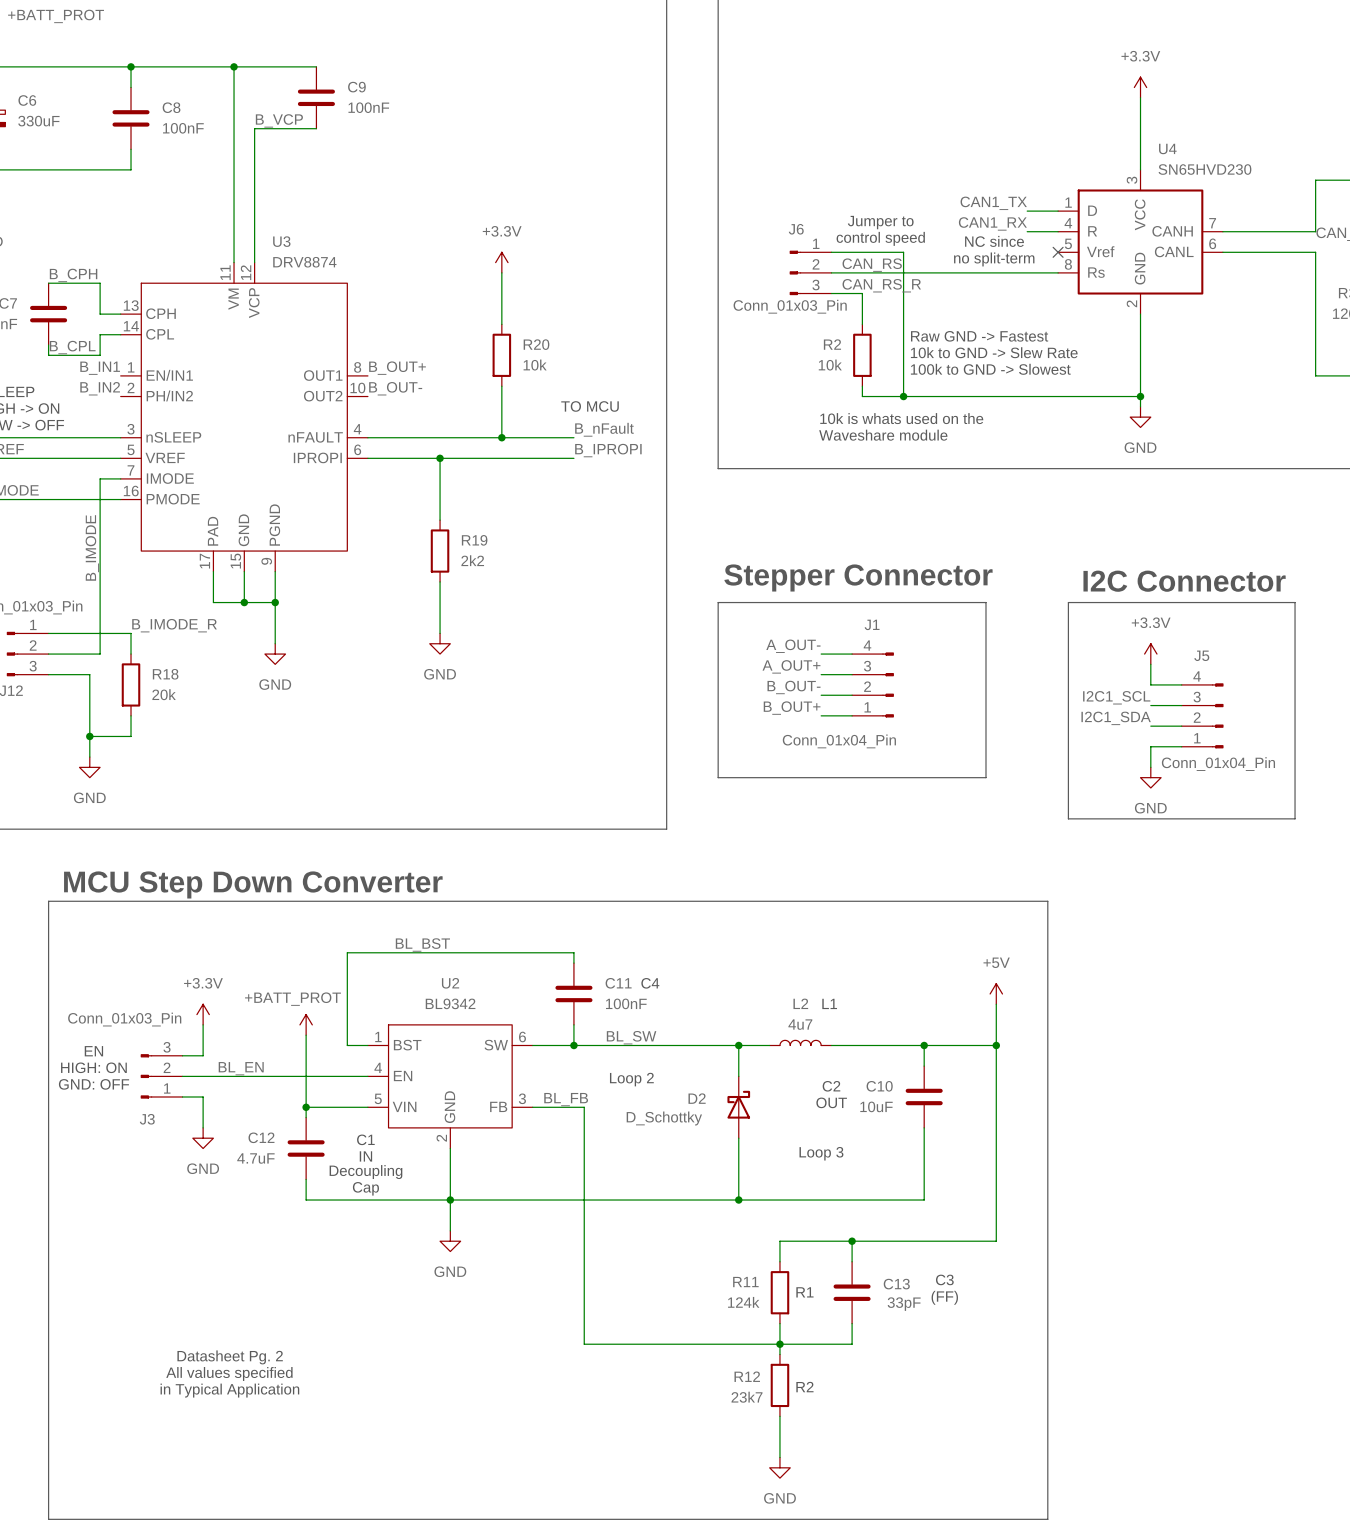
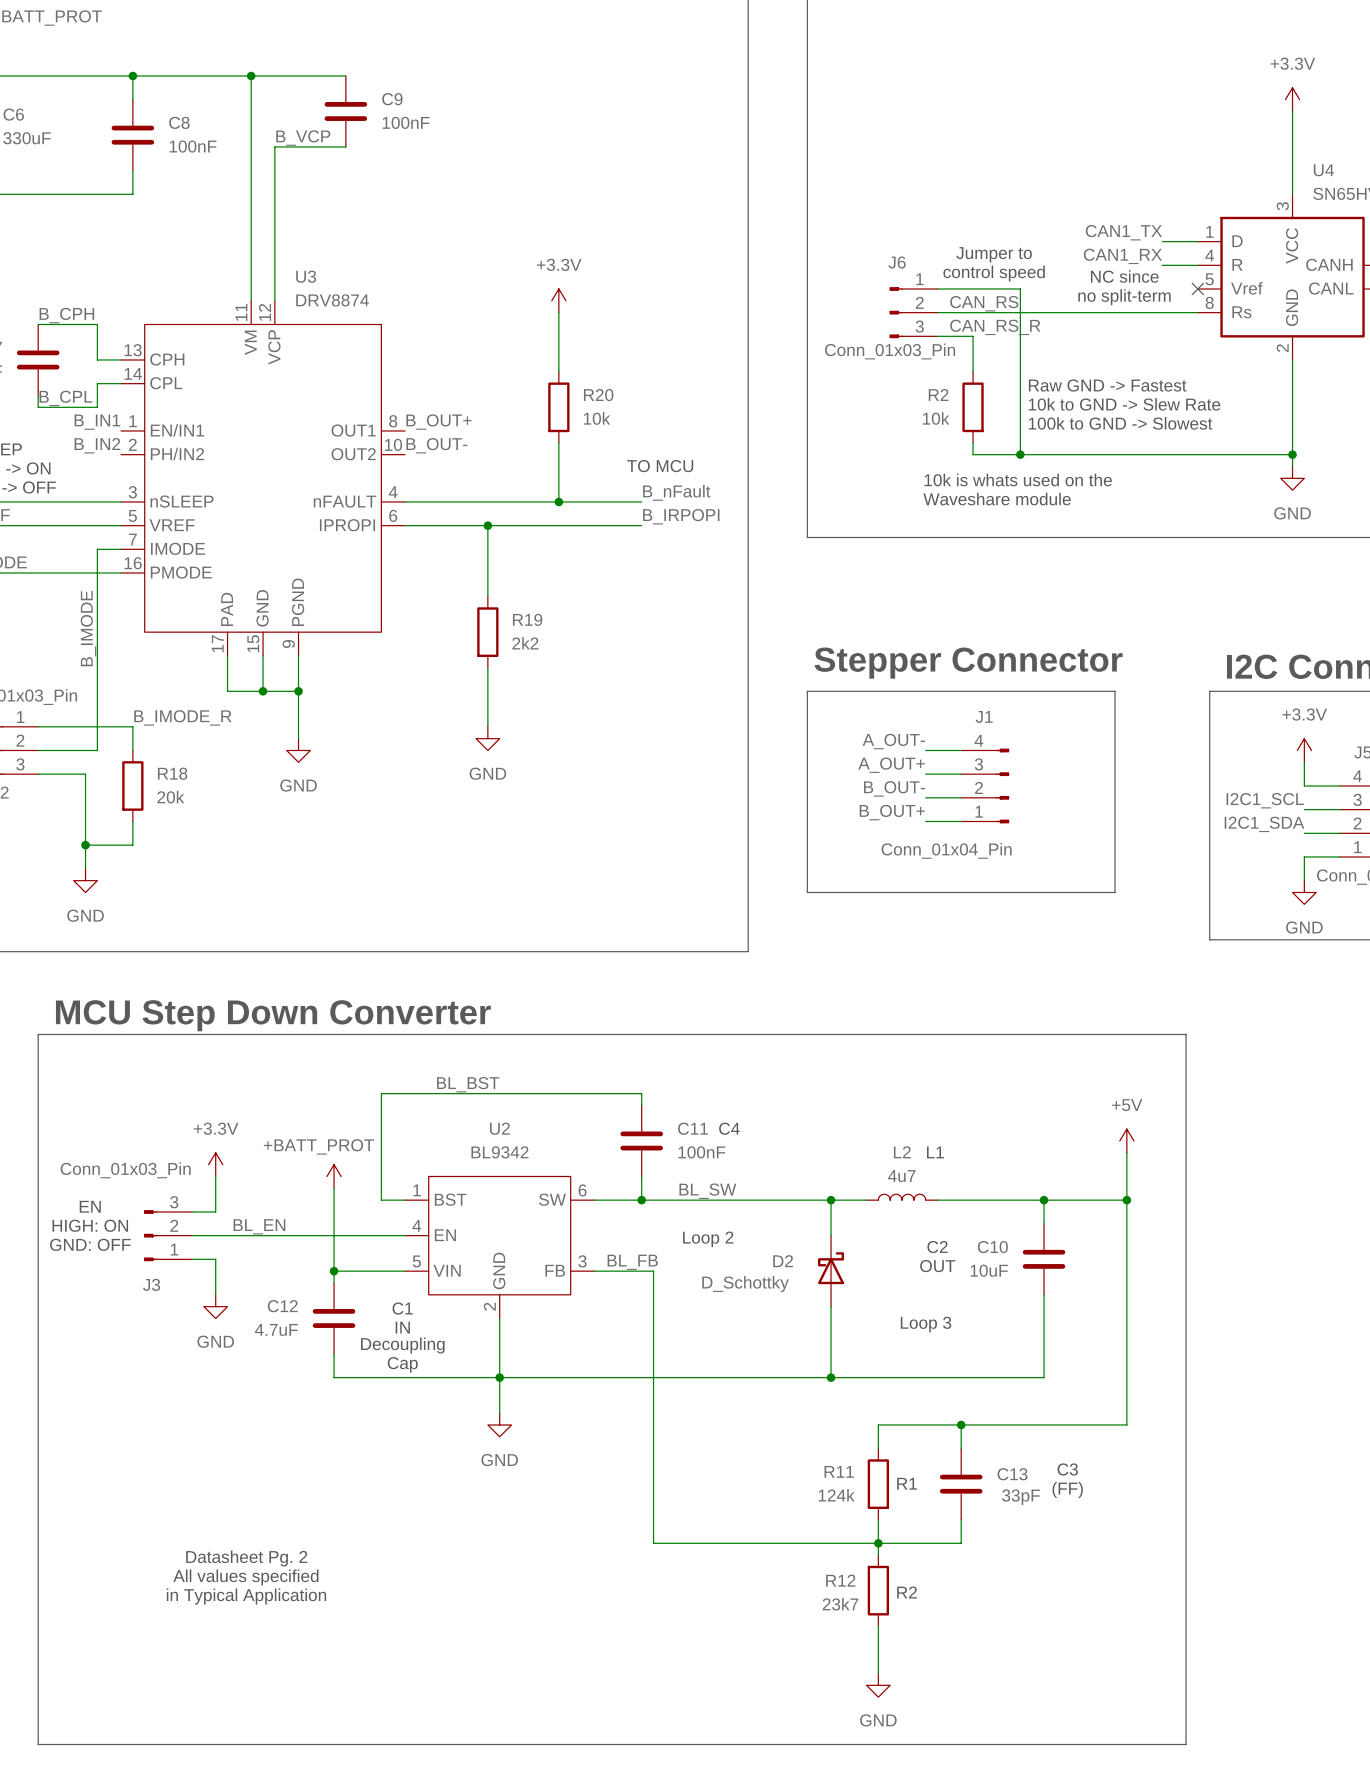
label: B_IPROPI (608, 450) -> B_IRPOPI (681, 516)

